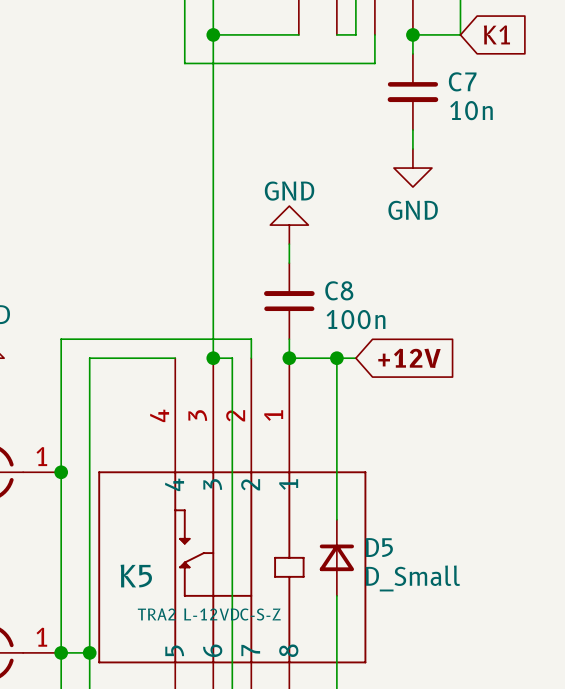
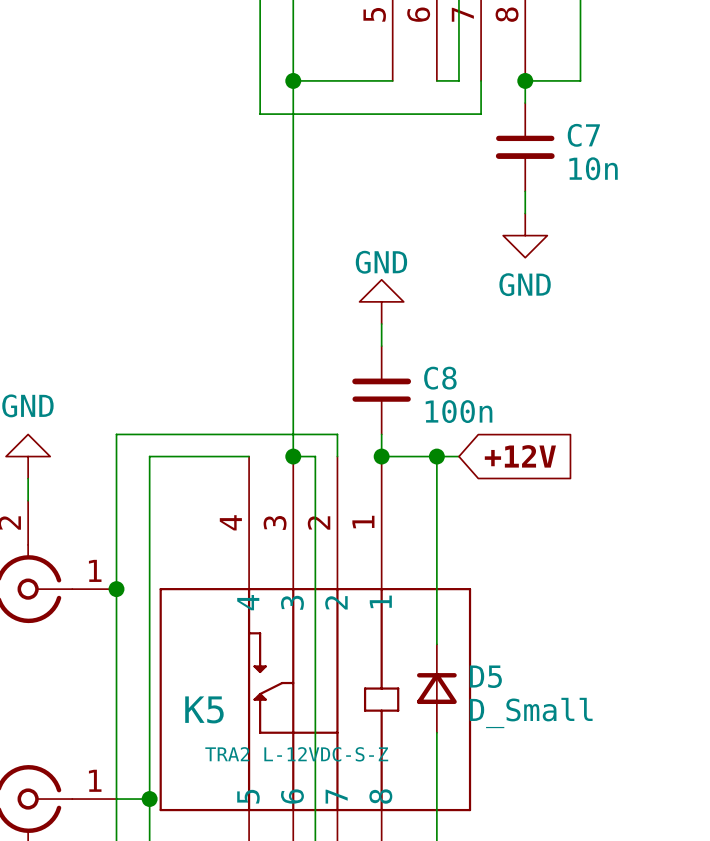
global label: K1 (496, 34) -> none
junction: (61, 652) -> none

